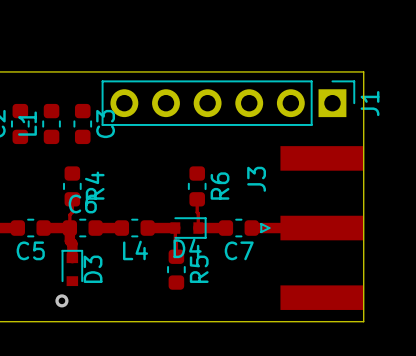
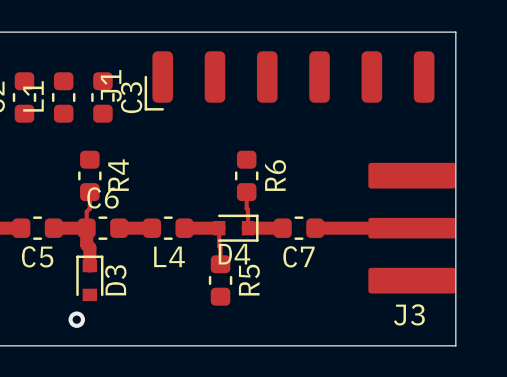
J1 footprint: [101, 80, 356, 126] -> [144, 51, 435, 111]
J1 name position: J1 (370, 103) -> J1 (111, 85)
J3 footprint: [260, 146, 364, 310] -> [368, 162, 456, 294]
J3 name position: J3 (256, 179) -> J3 (409, 314)

